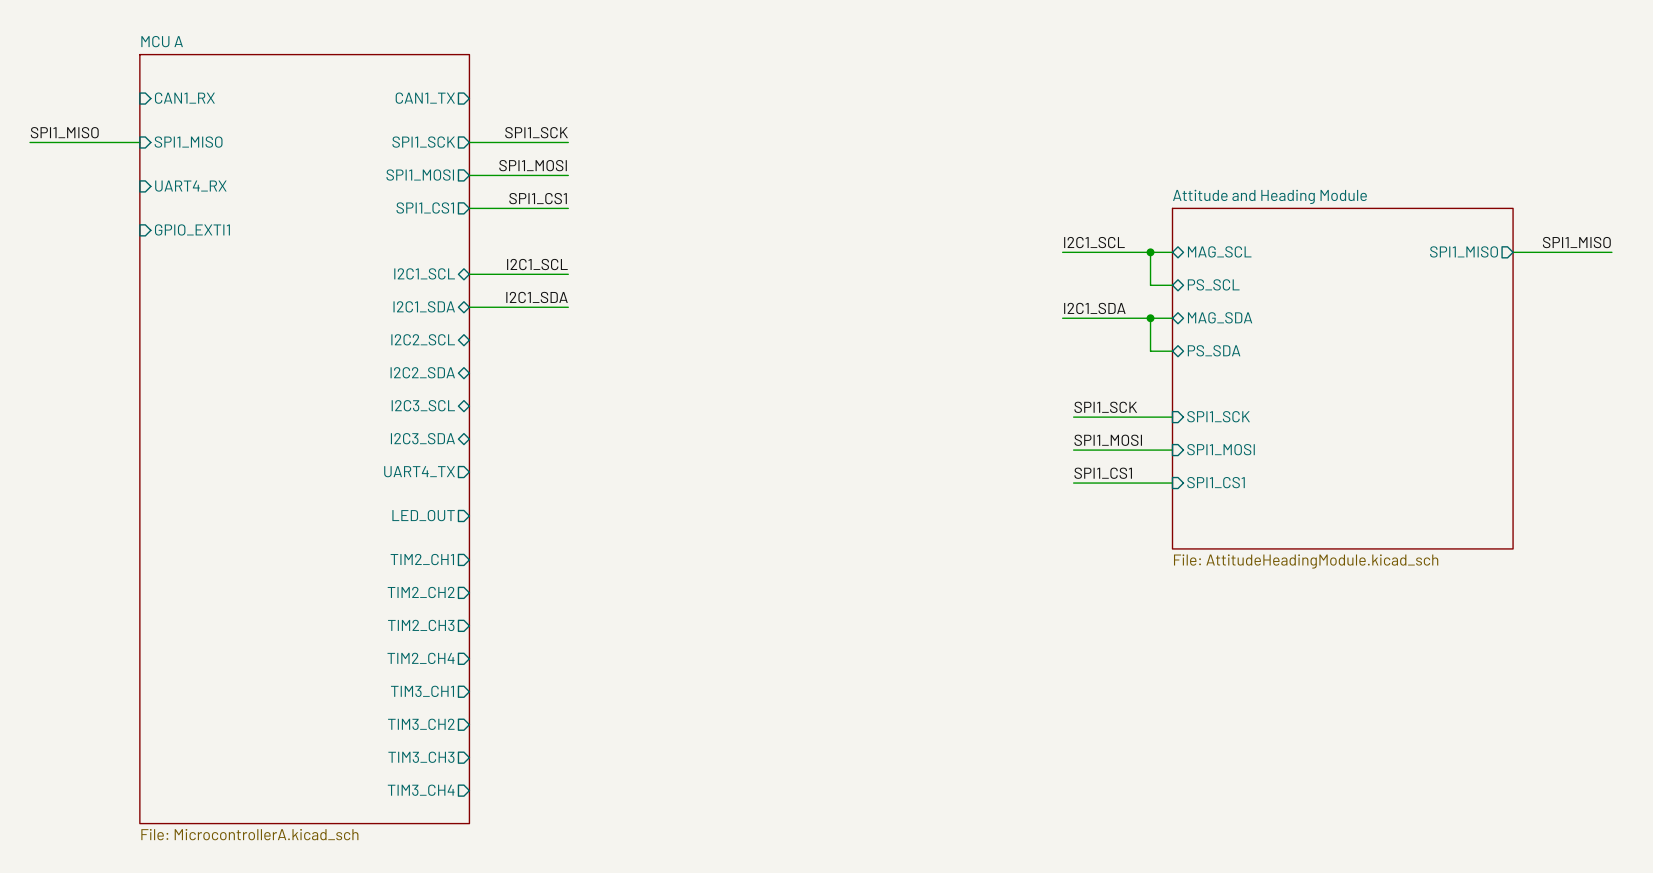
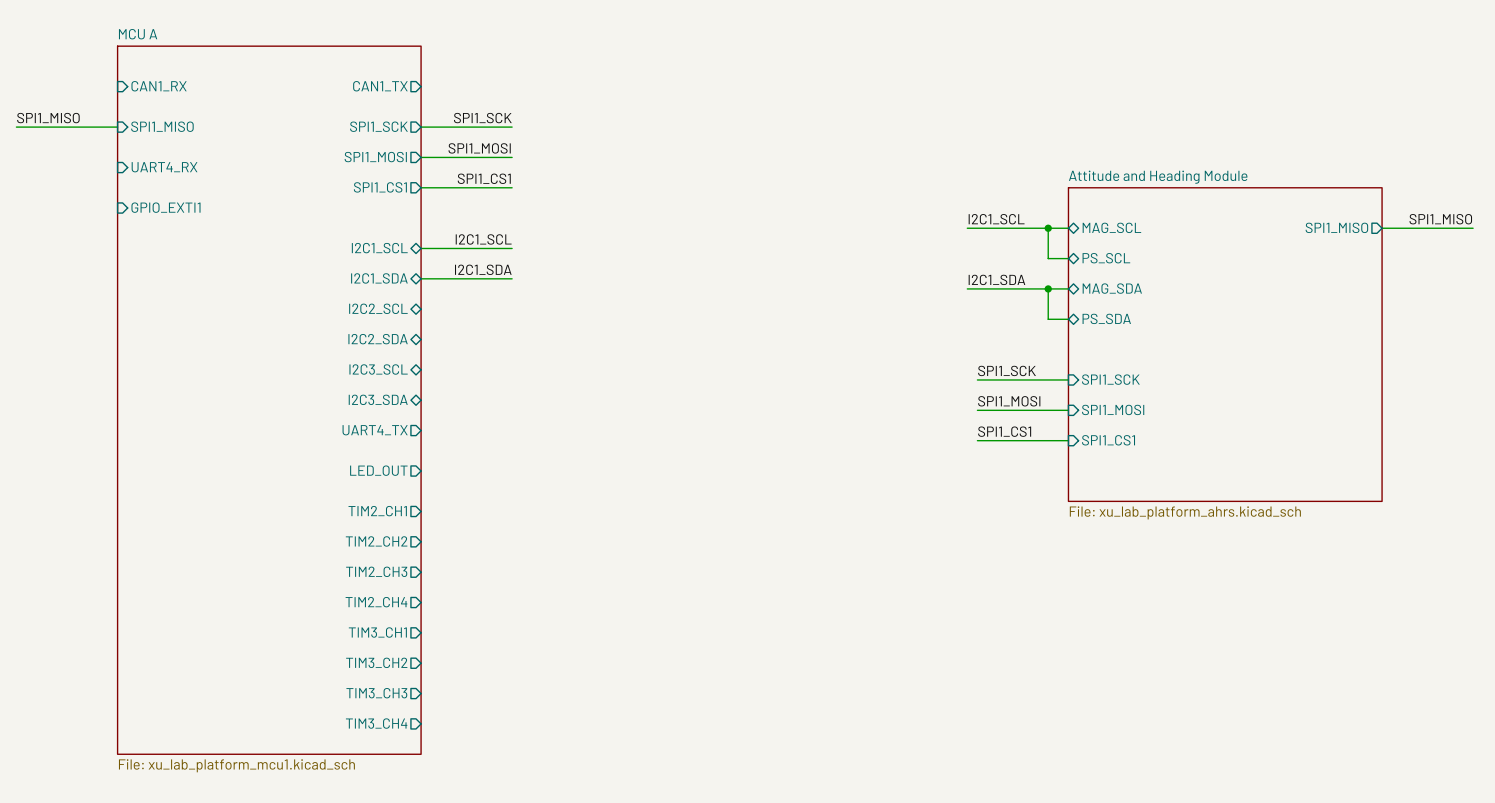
sheet Attitude and Heading Module value: File: AttitudeHeadingModule.kicad_sch (1306, 561) -> File: xu_lab_platform_ahrs.kicad_sch (1185, 512)
sheet MCU A value: File: MicrocontrollerA.kicad_sch (249, 834) -> File: xu_lab_platform_mcu1.kicad_sch (236, 765)

